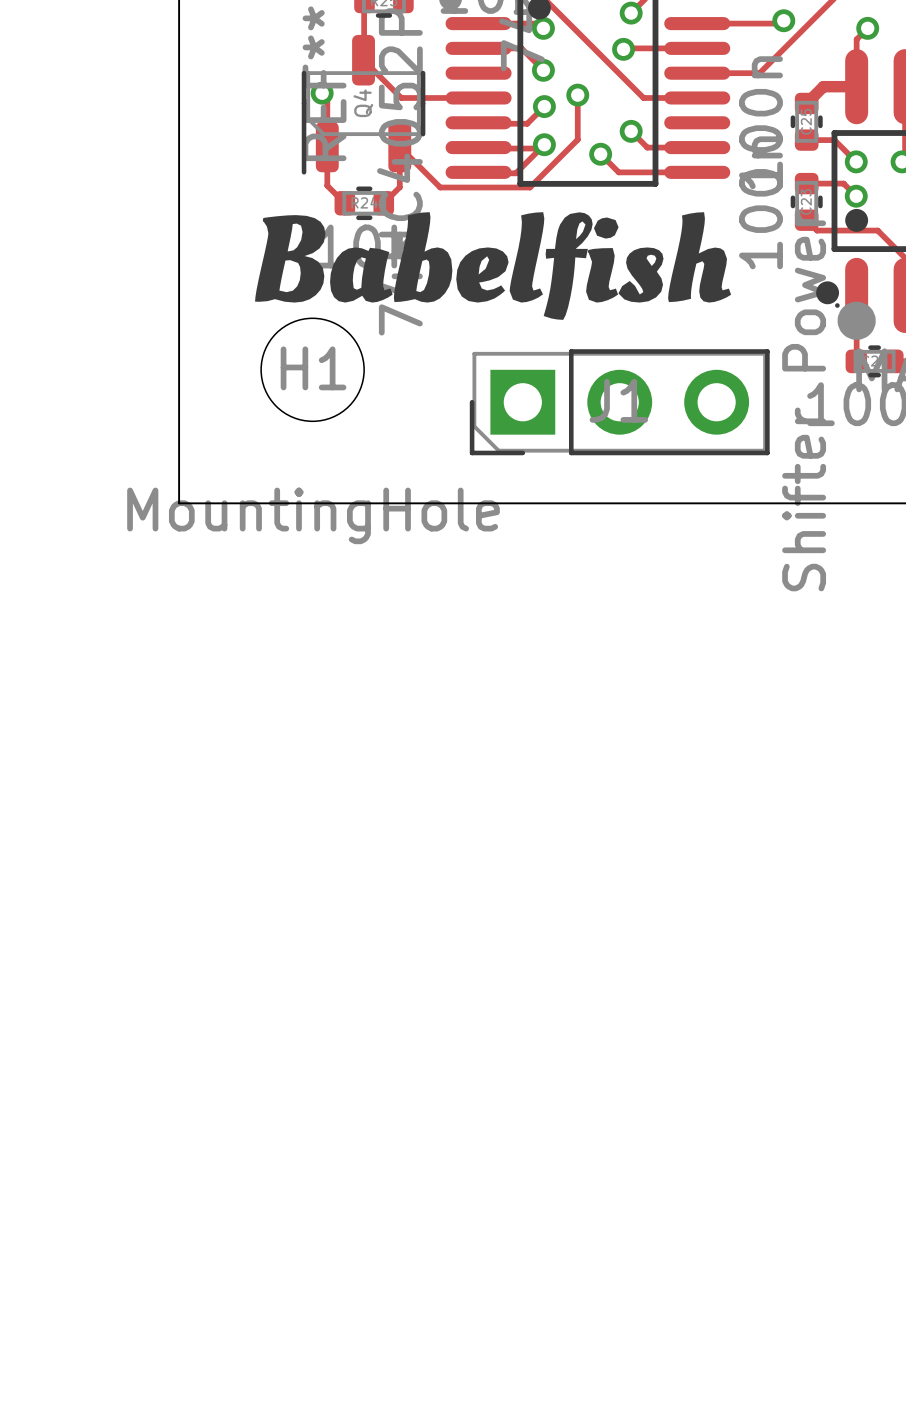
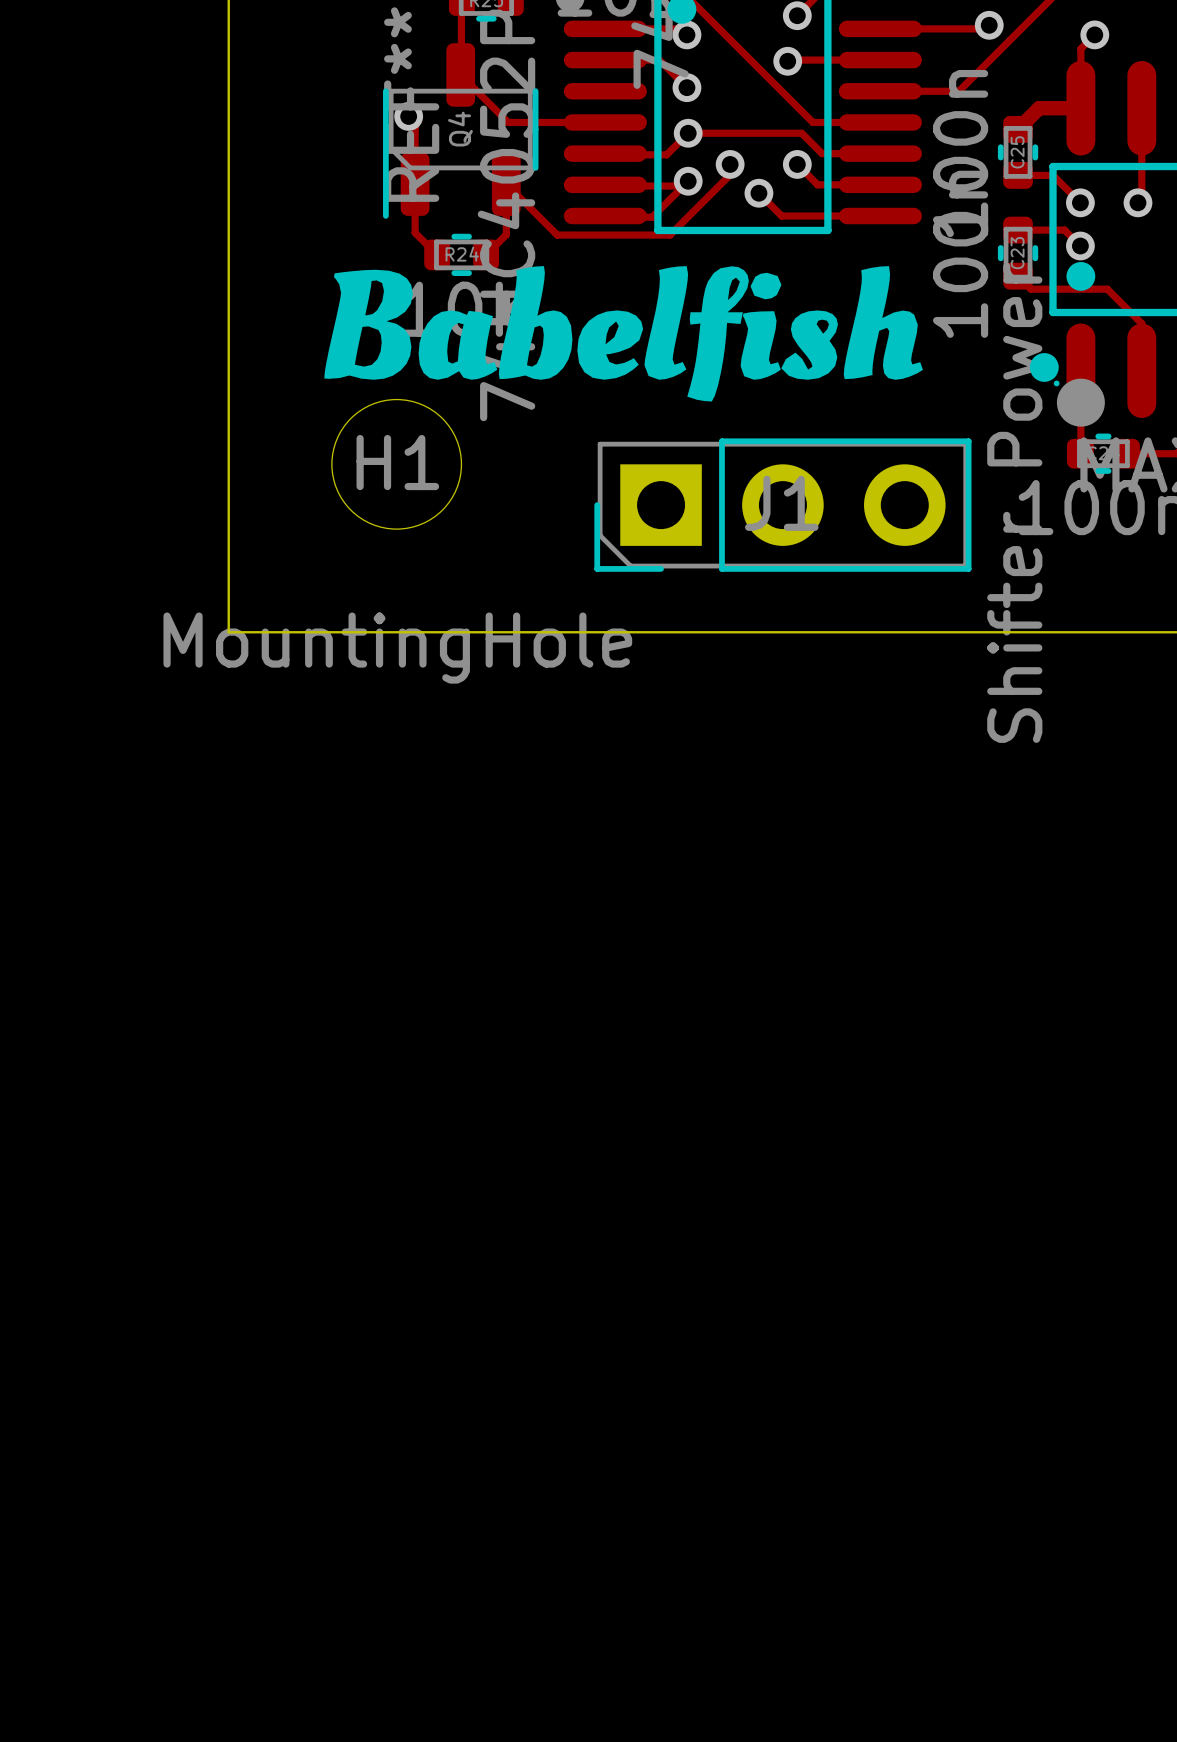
track: (577, 95) (577, 131) -> none
via position: (577, 95) -> (730, 164)
track: none -> (688, 133) (801, 133) (822, 153) (880, 153)

